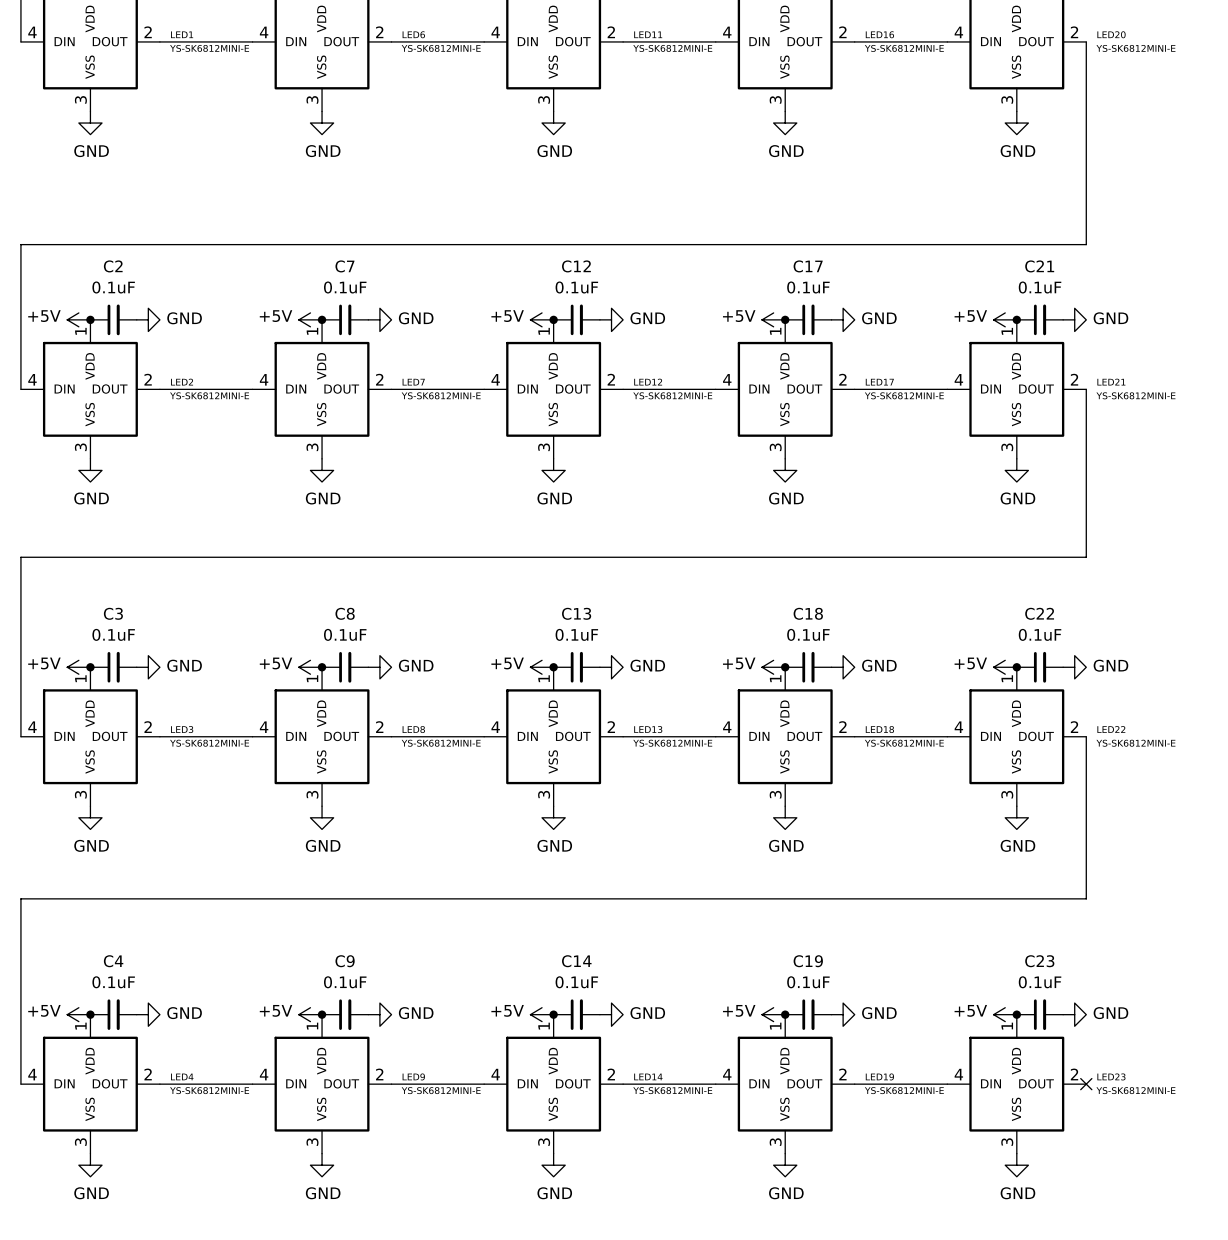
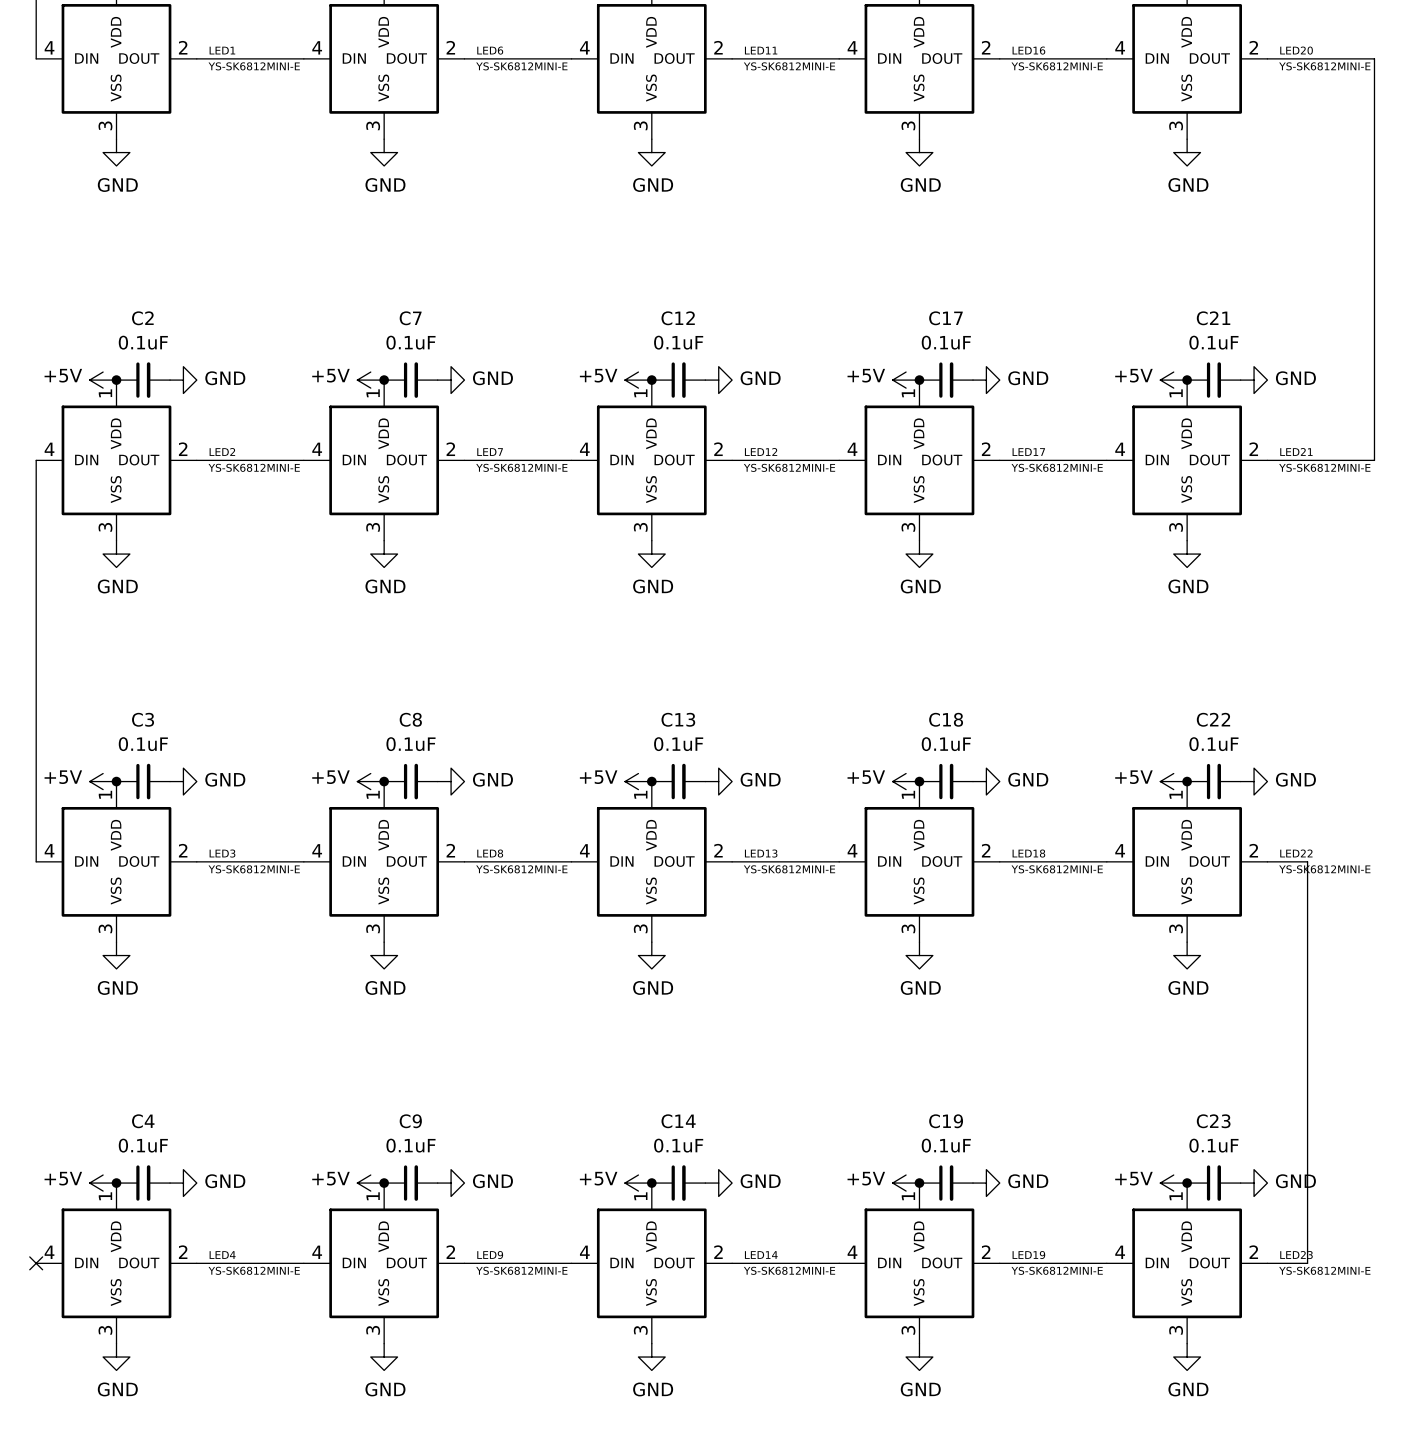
wire: (1086, 41) (1086, 244) (20, 244) (20, 389) -> (1267, 58) (1374, 58) (1374, 460) (1267, 460)
wire: (1086, 389) (1086, 557) (20, 557) -> (36, 460) (36, 654)
wire: (1086, 736) (1086, 898) (20, 898) (20, 1084) -> (1267, 861) (1307, 861) (1307, 1263) (1267, 1263)
no-connect mark: none -> (36, 1263)
no-connect mark: (1086, 1084) -> none

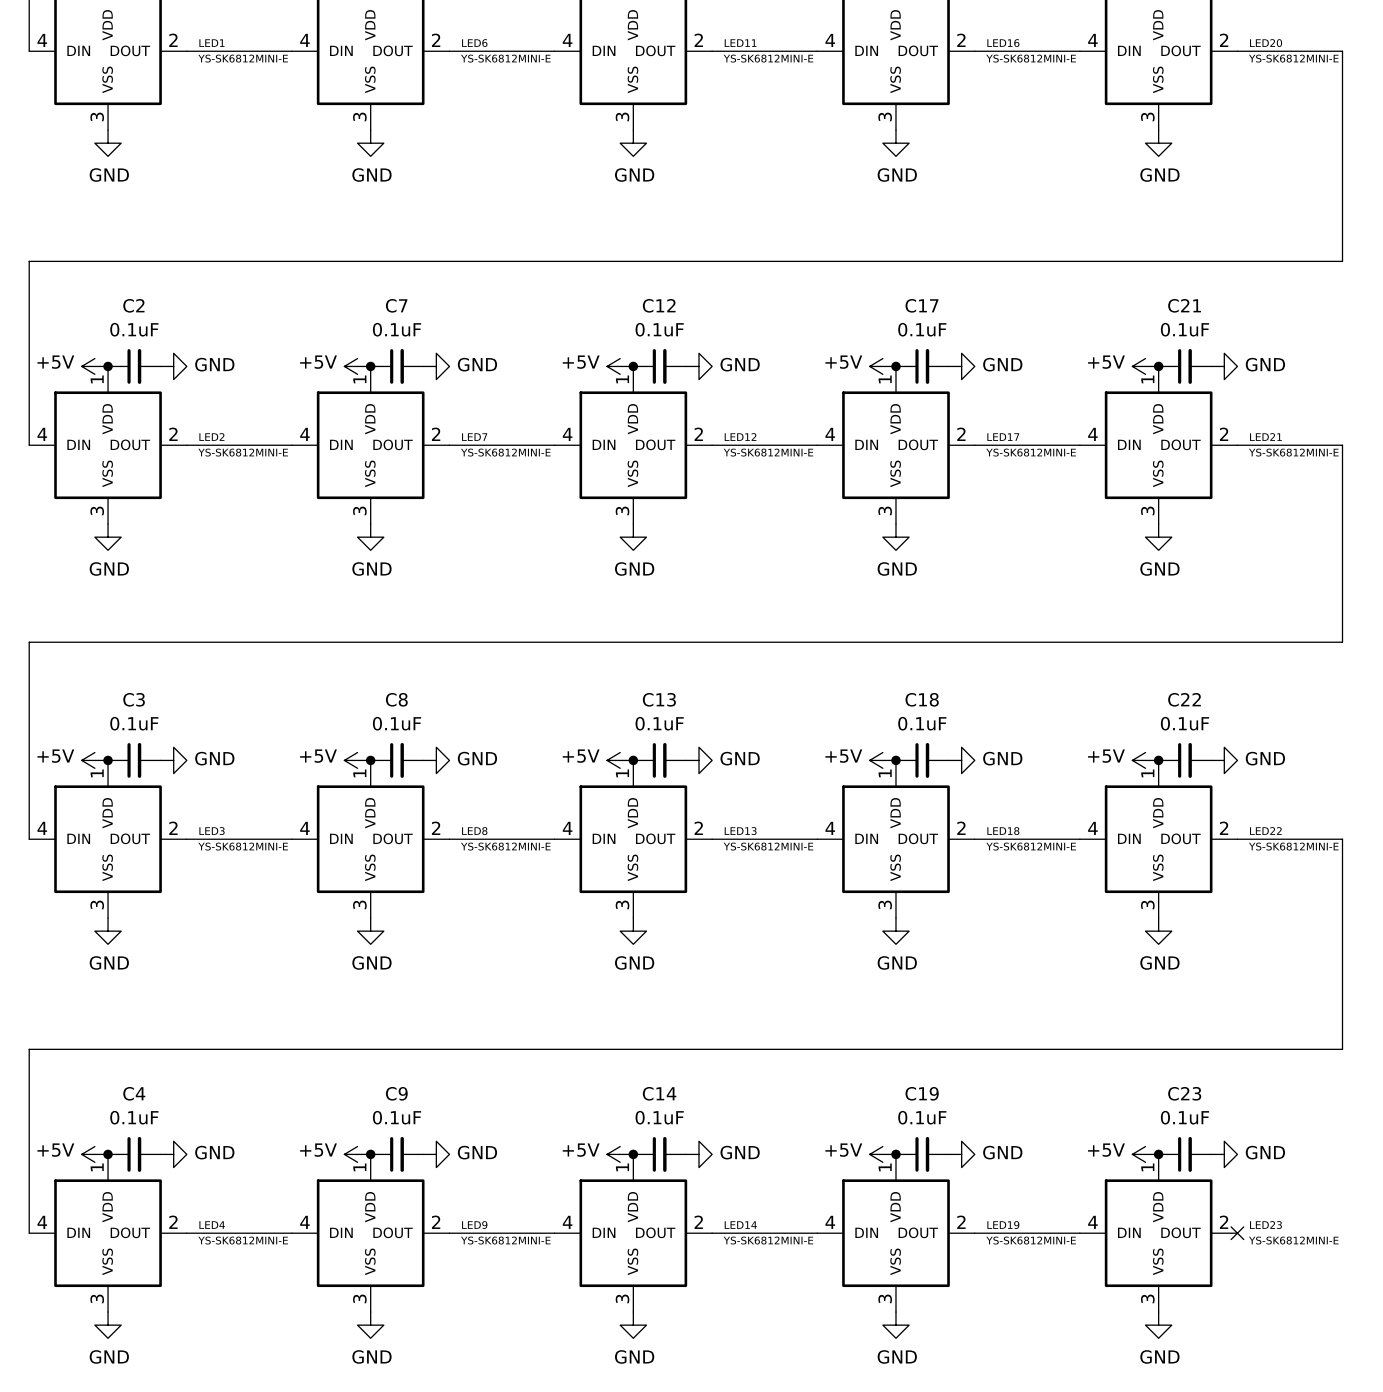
wire: (1374, 273) (1374, 460) -> (1342, 261) (29, 261) (29, 445)
wire: (36, 460) (36, 661) -> (1342, 445) (1342, 642) (29, 642)
wire: (1307, 861) (1307, 1263) (1267, 1263) -> (1276, 839) (1342, 839) (1342, 1049) (29, 1049) (29, 1233)
no-connect mark: (36, 1263) -> none
no-connect mark: none -> (1237, 1233)

